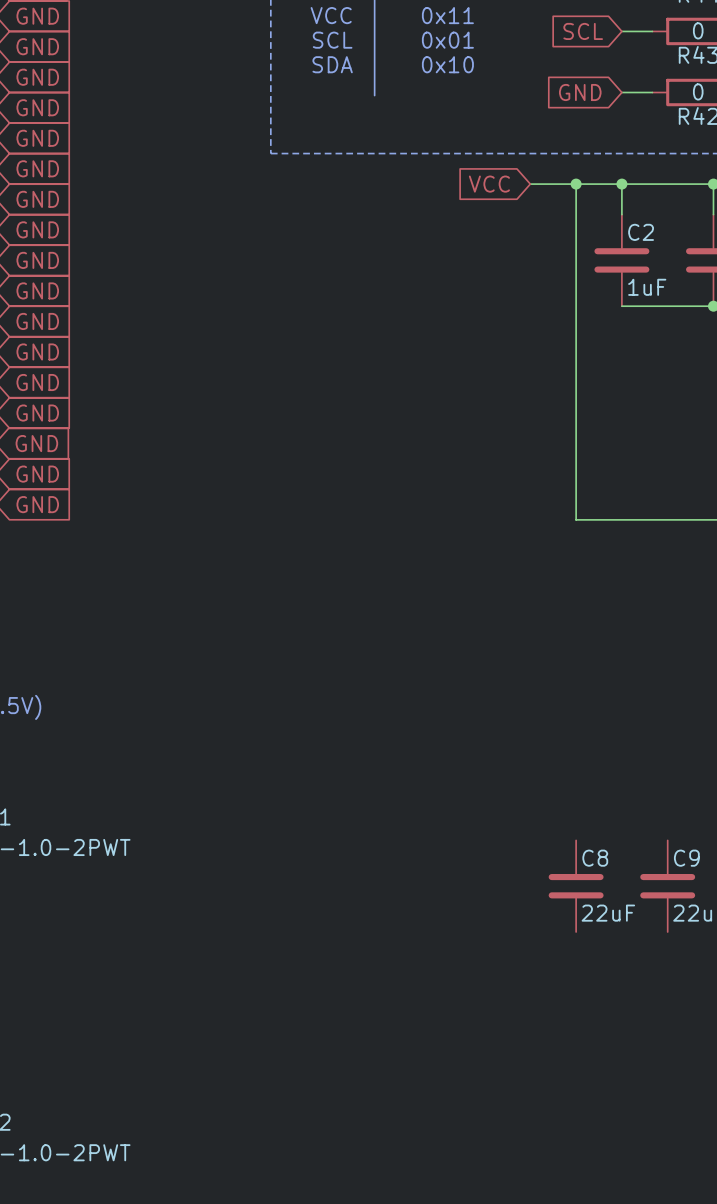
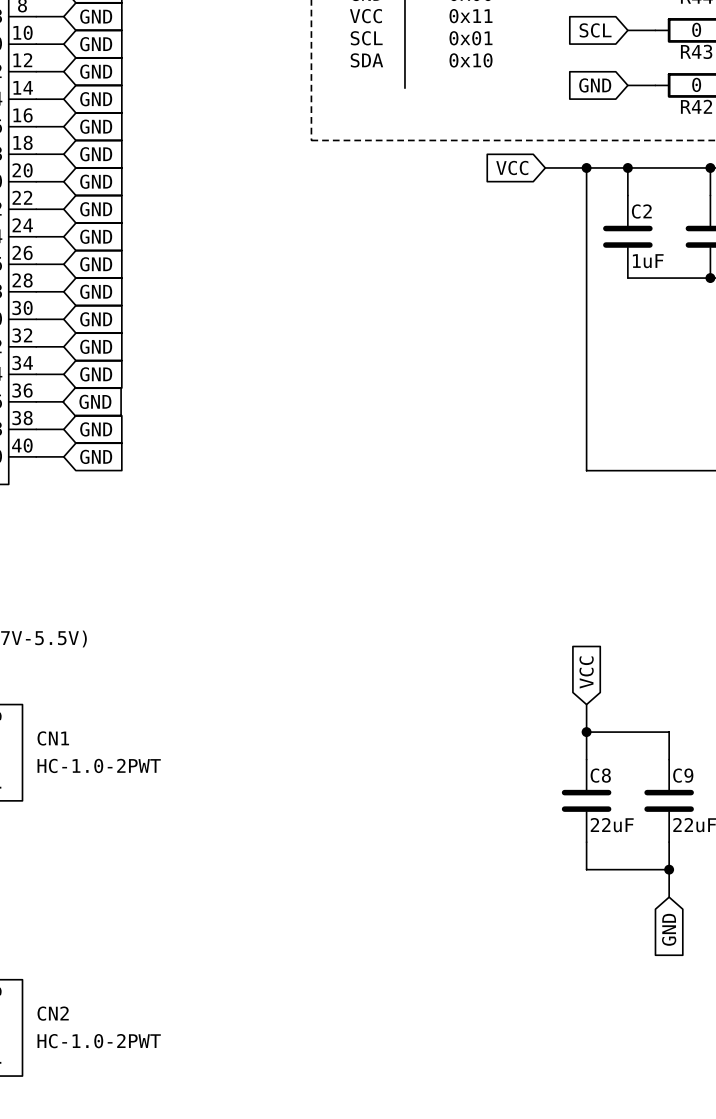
global label: none -> VCC (586, 672)
wire: none -> (586, 704) (586, 759)
wire: none -> (586, 732) (669, 732) (669, 759)
junction: none -> (586, 732)
wire: none -> (586, 842) (586, 869) (669, 869)
wire: none -> (669, 842) (669, 897)
junction: none -> (669, 869)
global label: none -> GND (669, 929)

